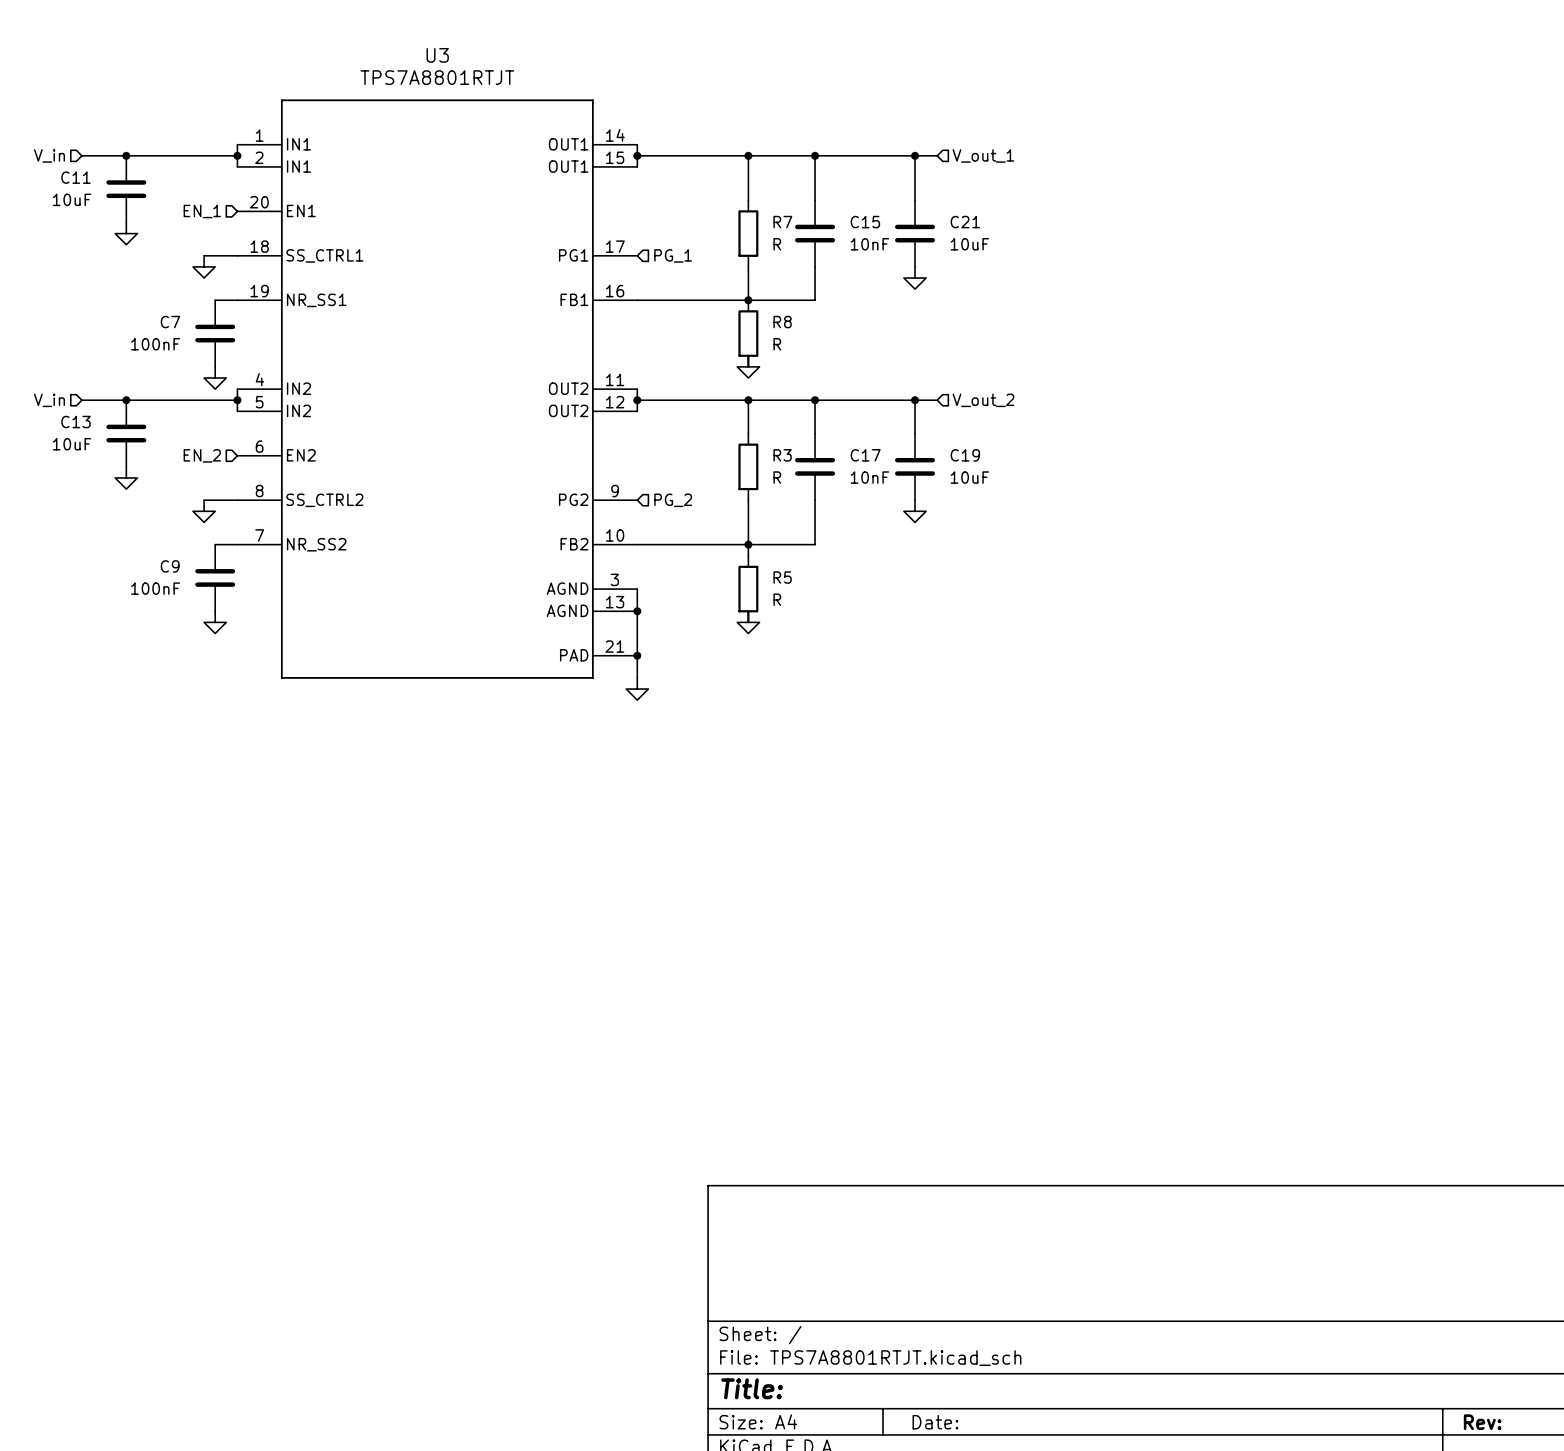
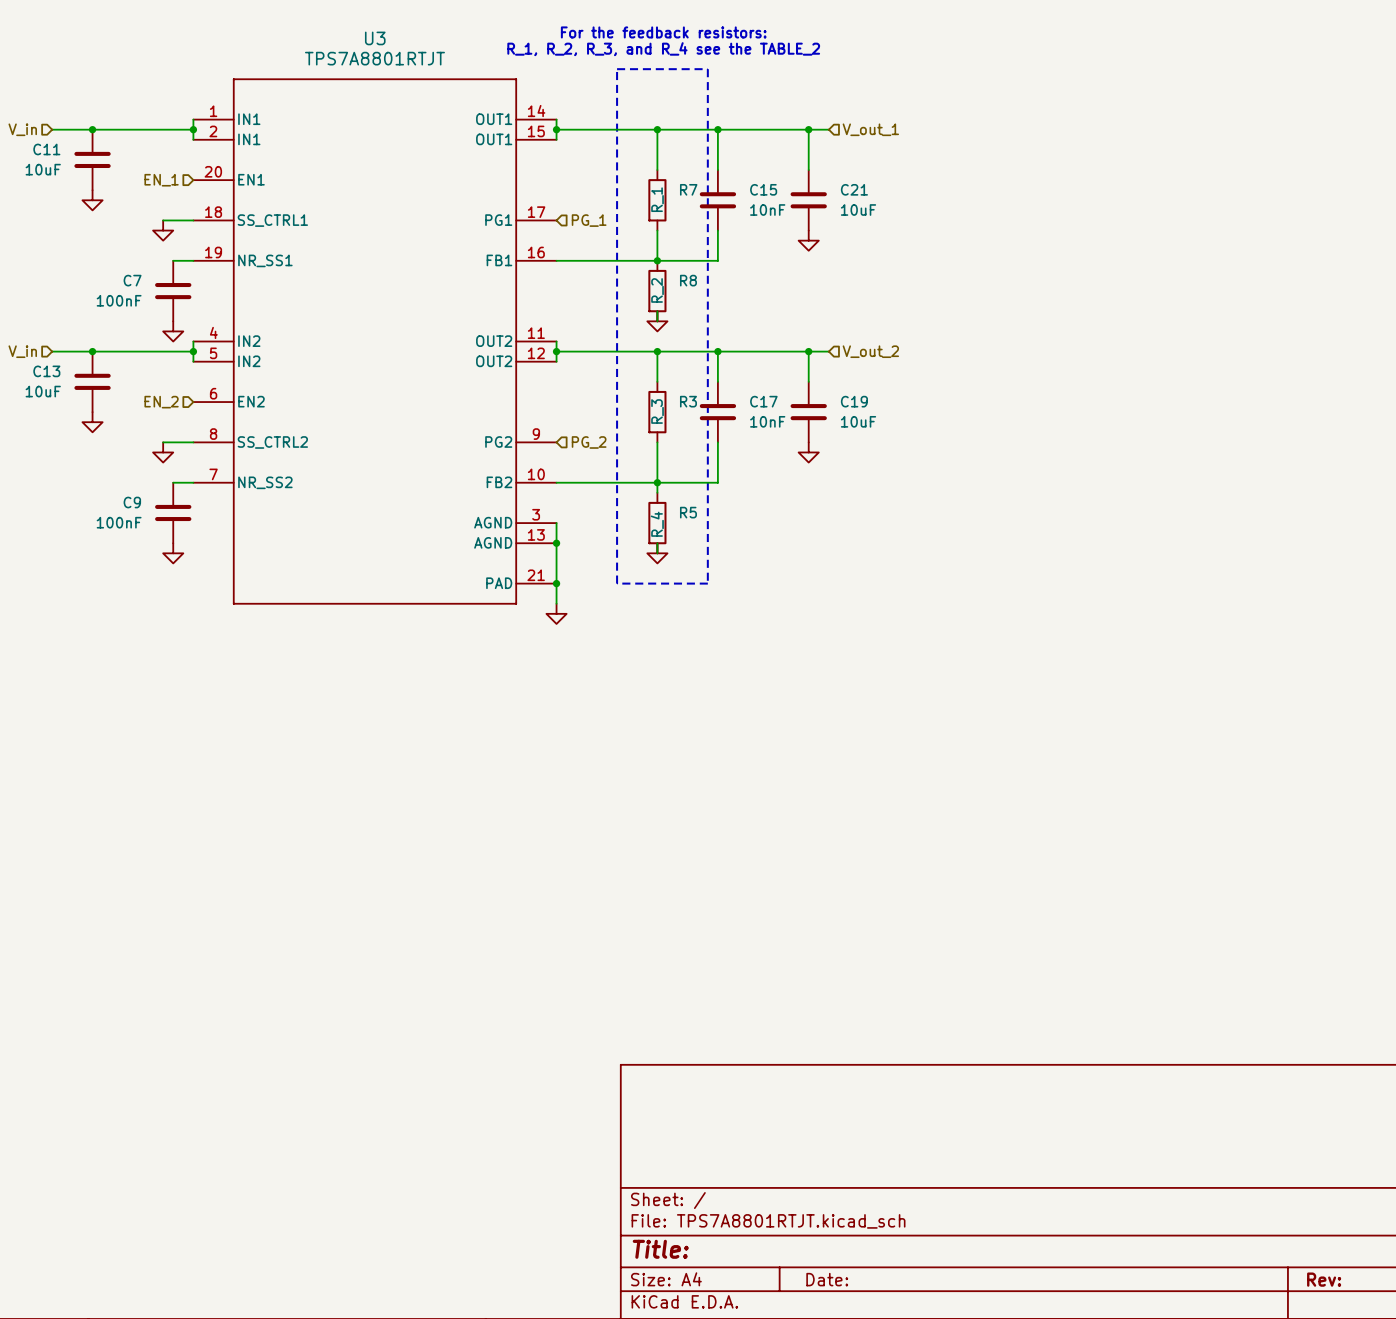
text: none -> For the feedback resistors: (663, 32)
text: none -> R_1, R_2, R_3, and R_4 see the TABLE_2 (663, 49)
line: none -> (617, 69) (707, 69) (707, 583) (617, 583) (617, 69)
R7 value: R (777, 244) -> R_1 (657, 199)
R8 value: R (777, 344) -> R_2 (657, 290)
R3 value: R (777, 477) -> R_3 (657, 411)
R5 value: R (777, 599) -> R_4 (657, 524)

